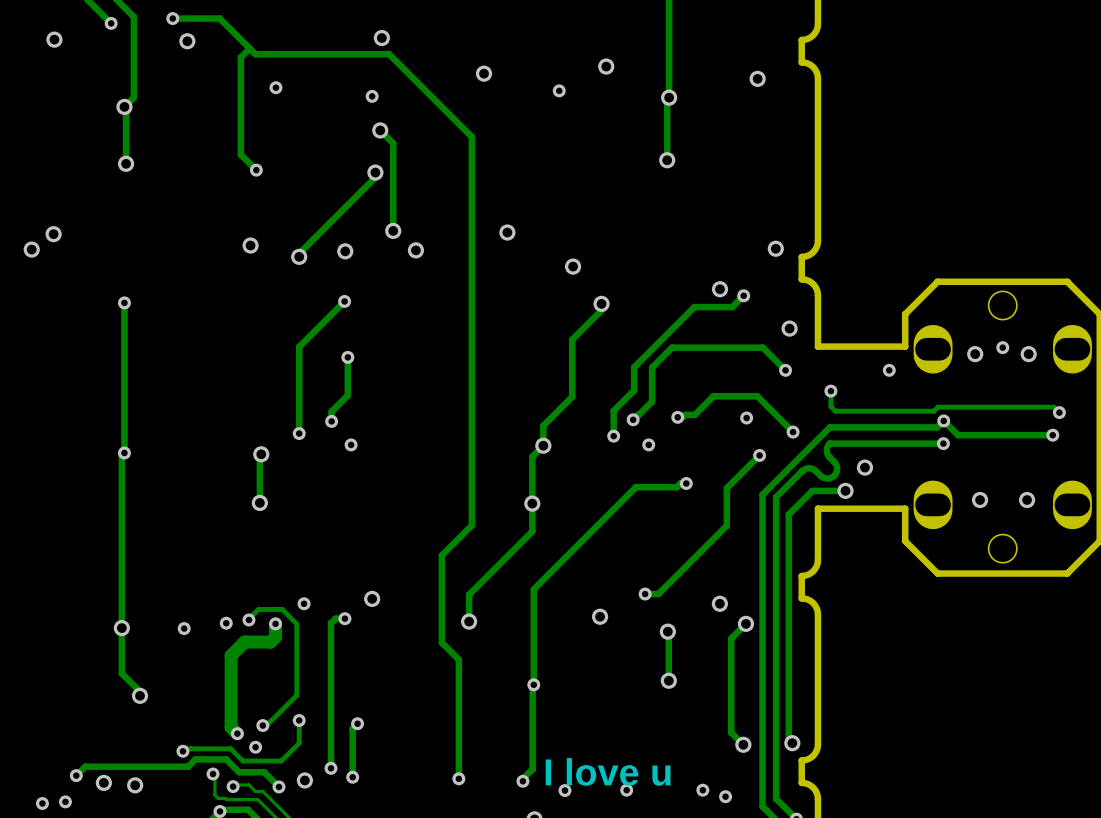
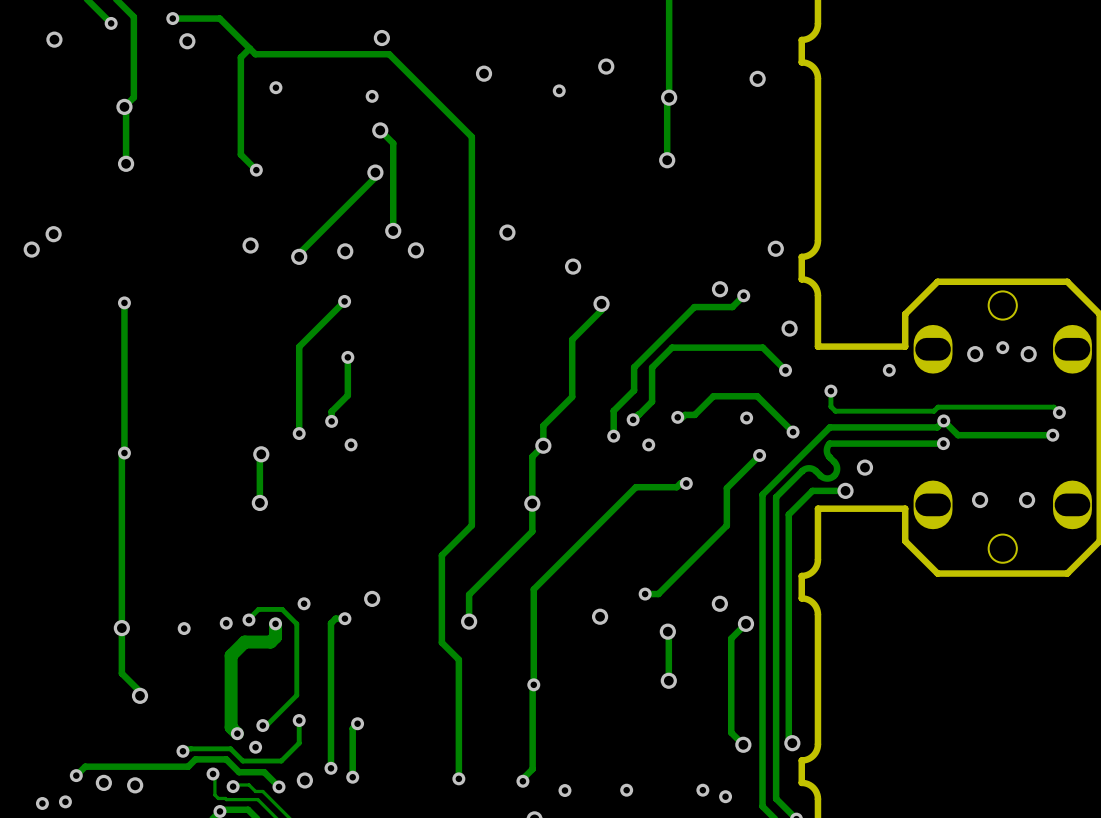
text: I love u (608, 771) -> none

